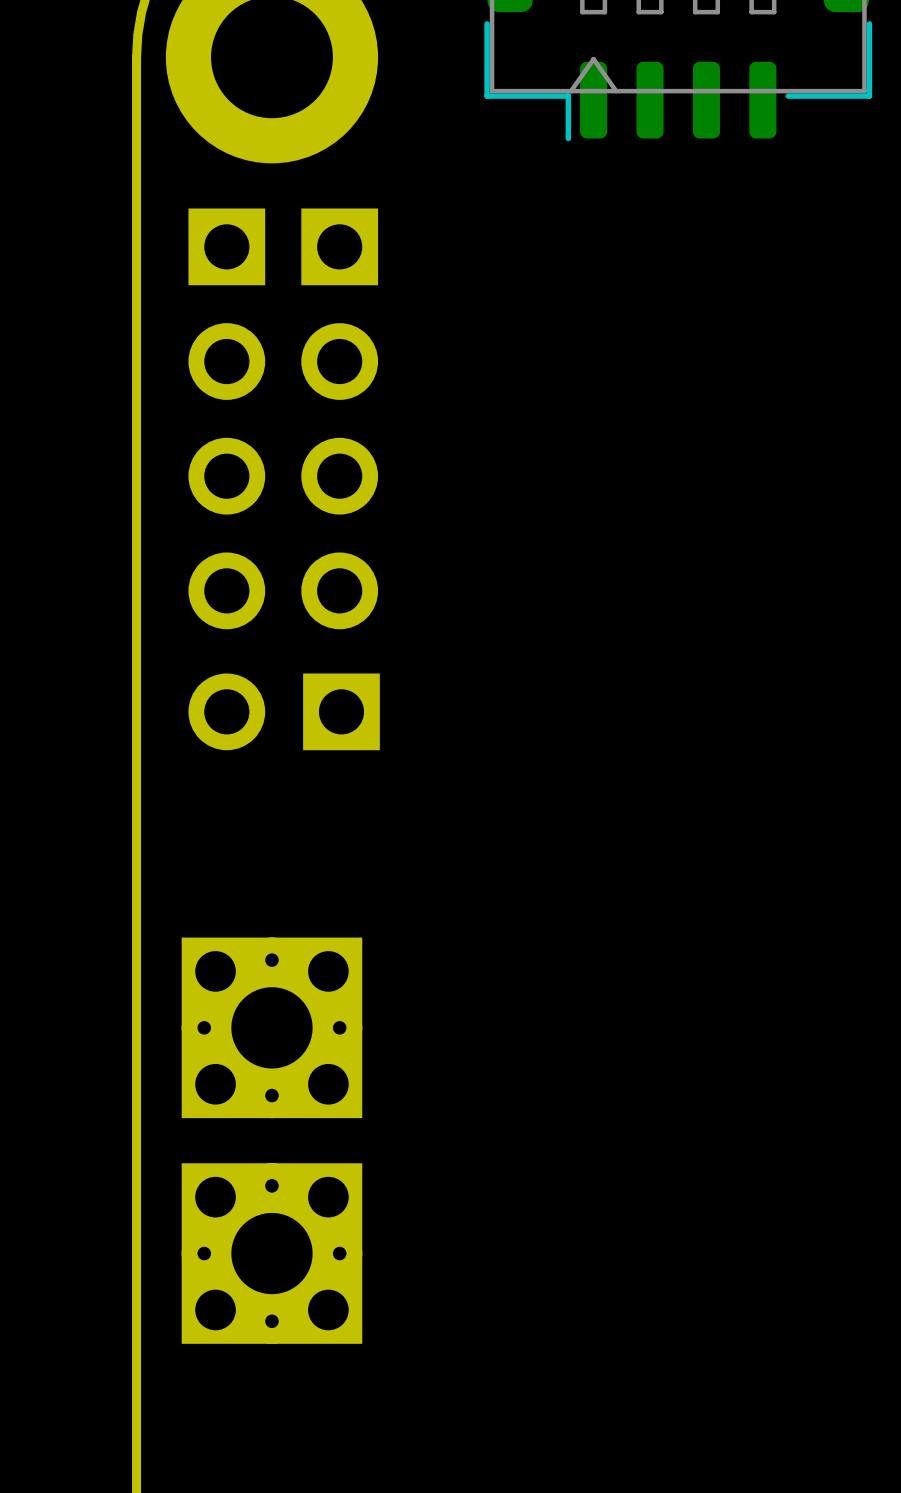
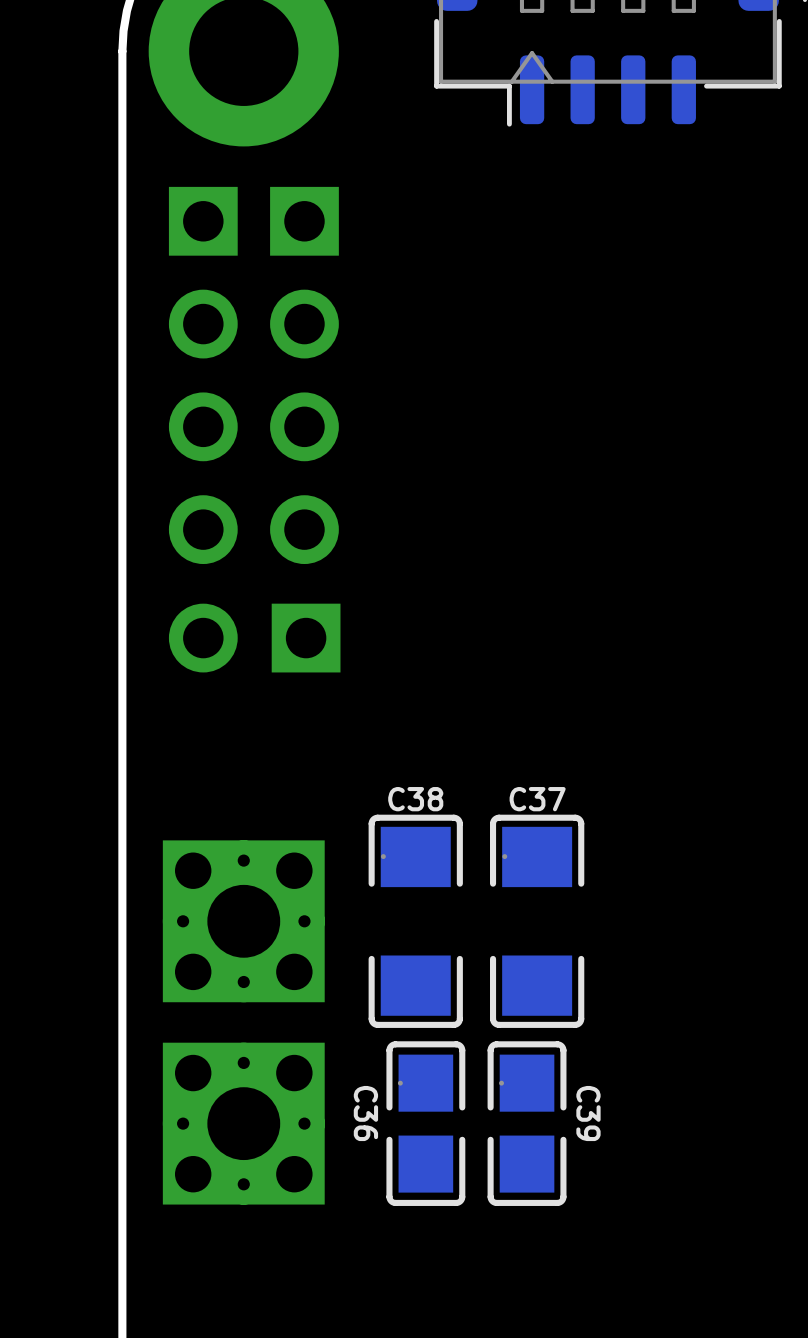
C38: none -> (415, 921)
C37: none -> (537, 921)
C36: none -> (425, 1123)
C39: none -> (527, 1123)

